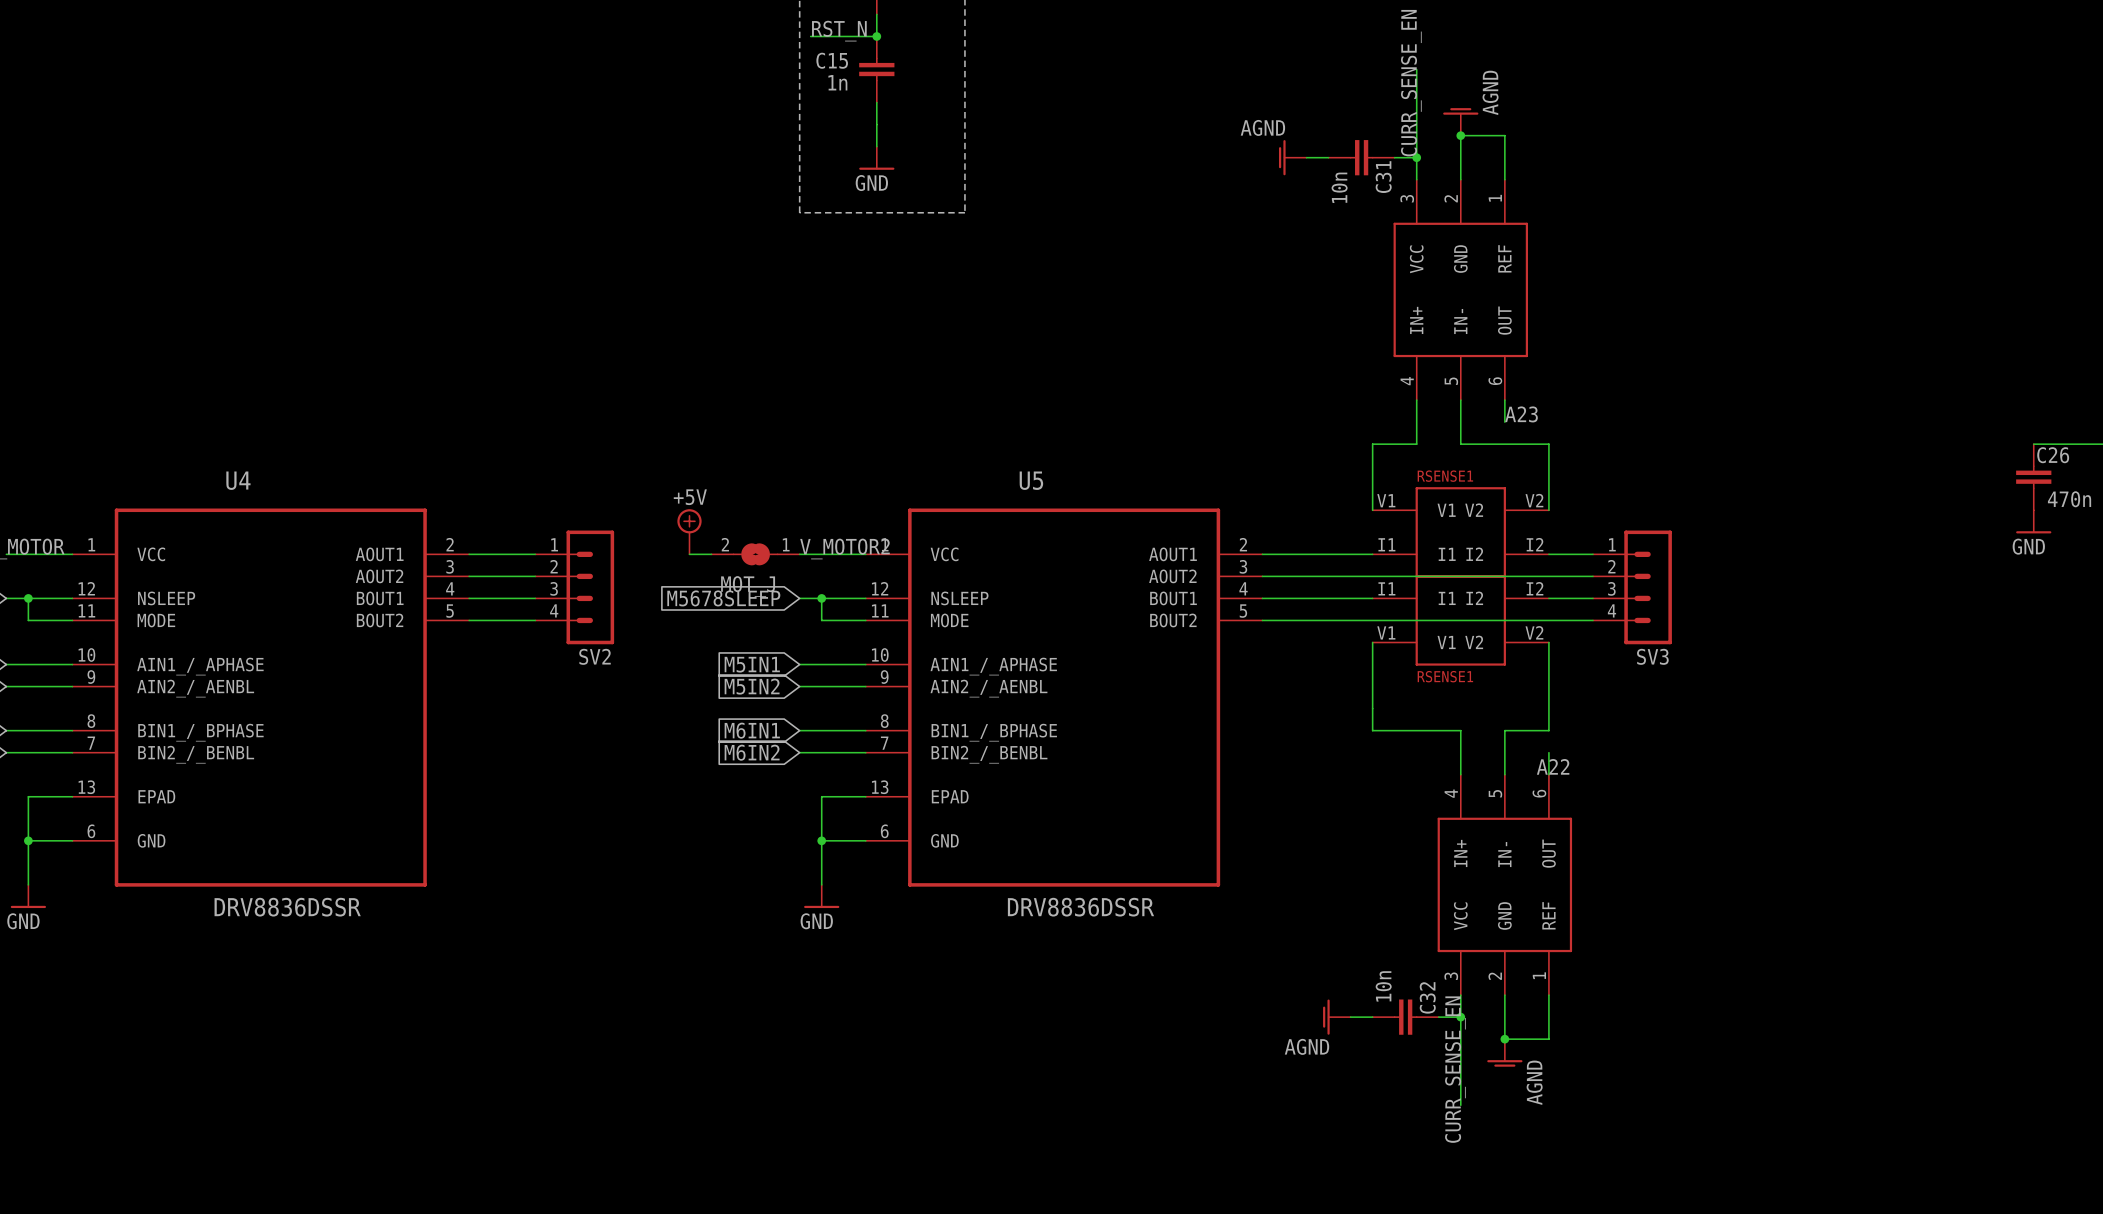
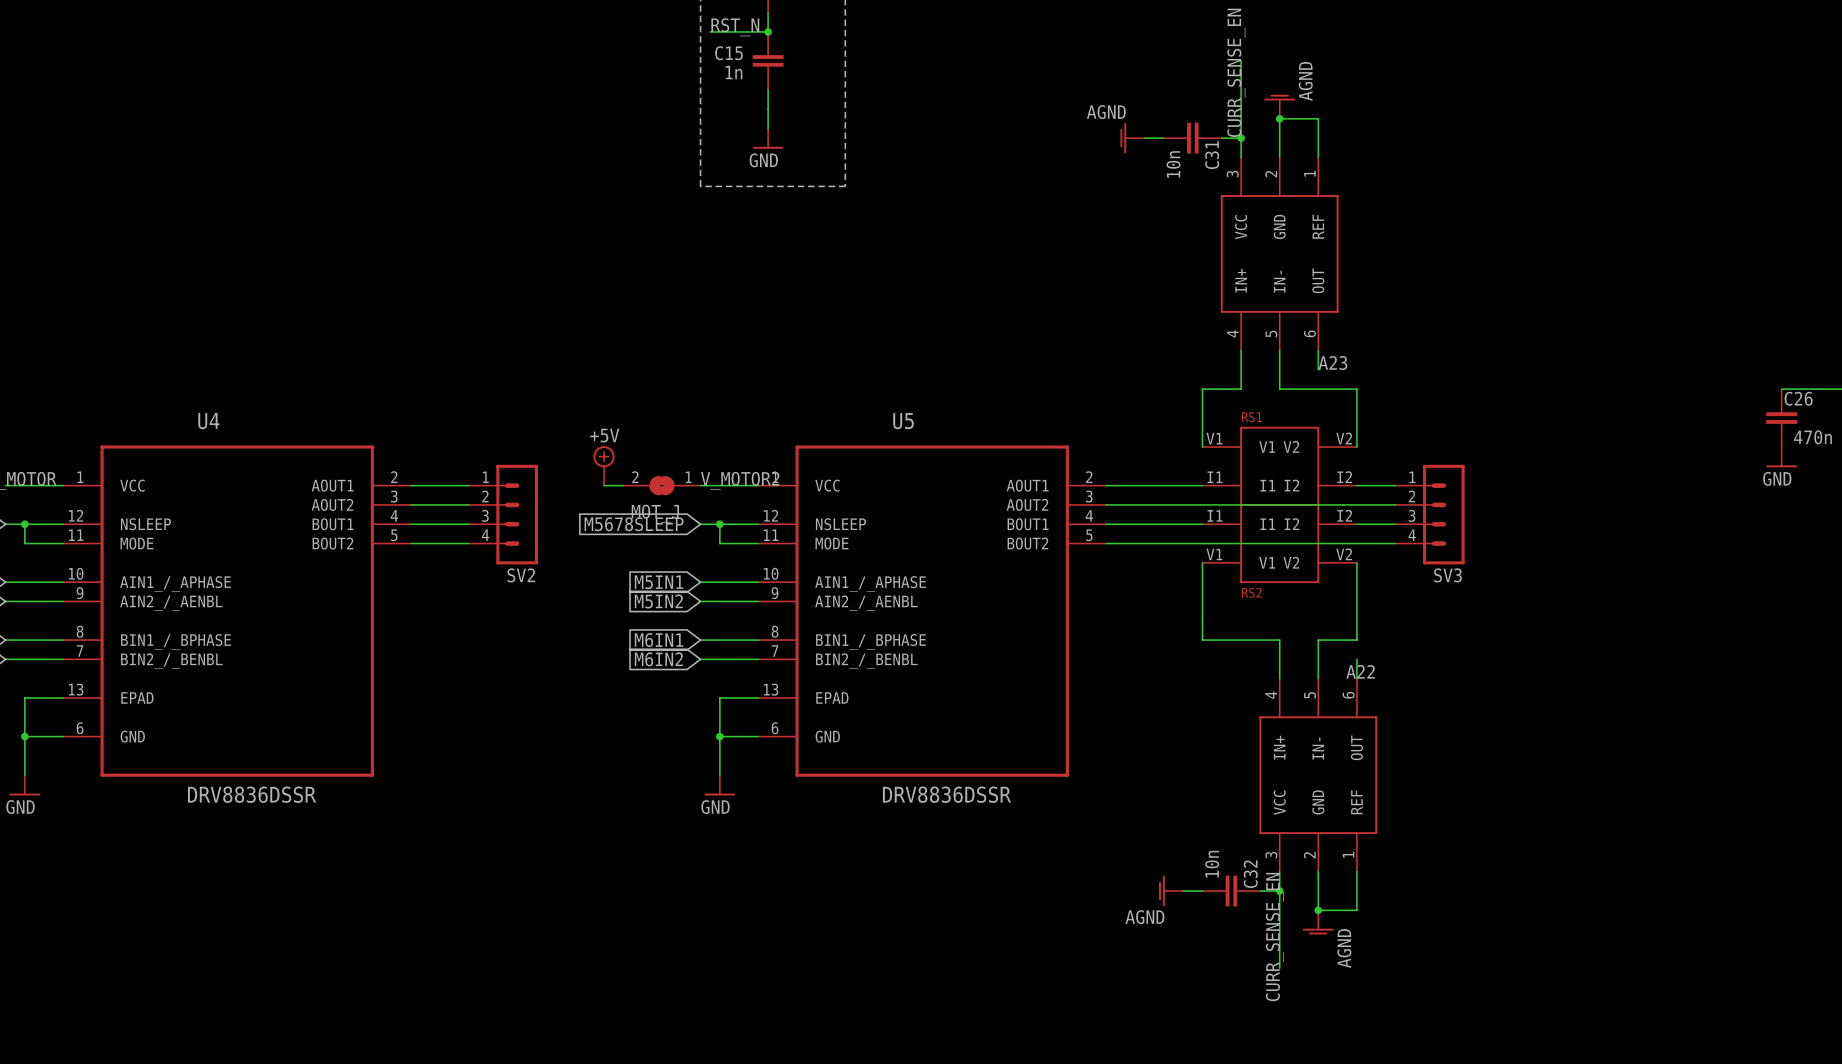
part value: RSENSE1 (1445, 476) -> RS1 (1251, 417)
part value: RSENSE1 (1445, 676) -> RS2 (1251, 592)

